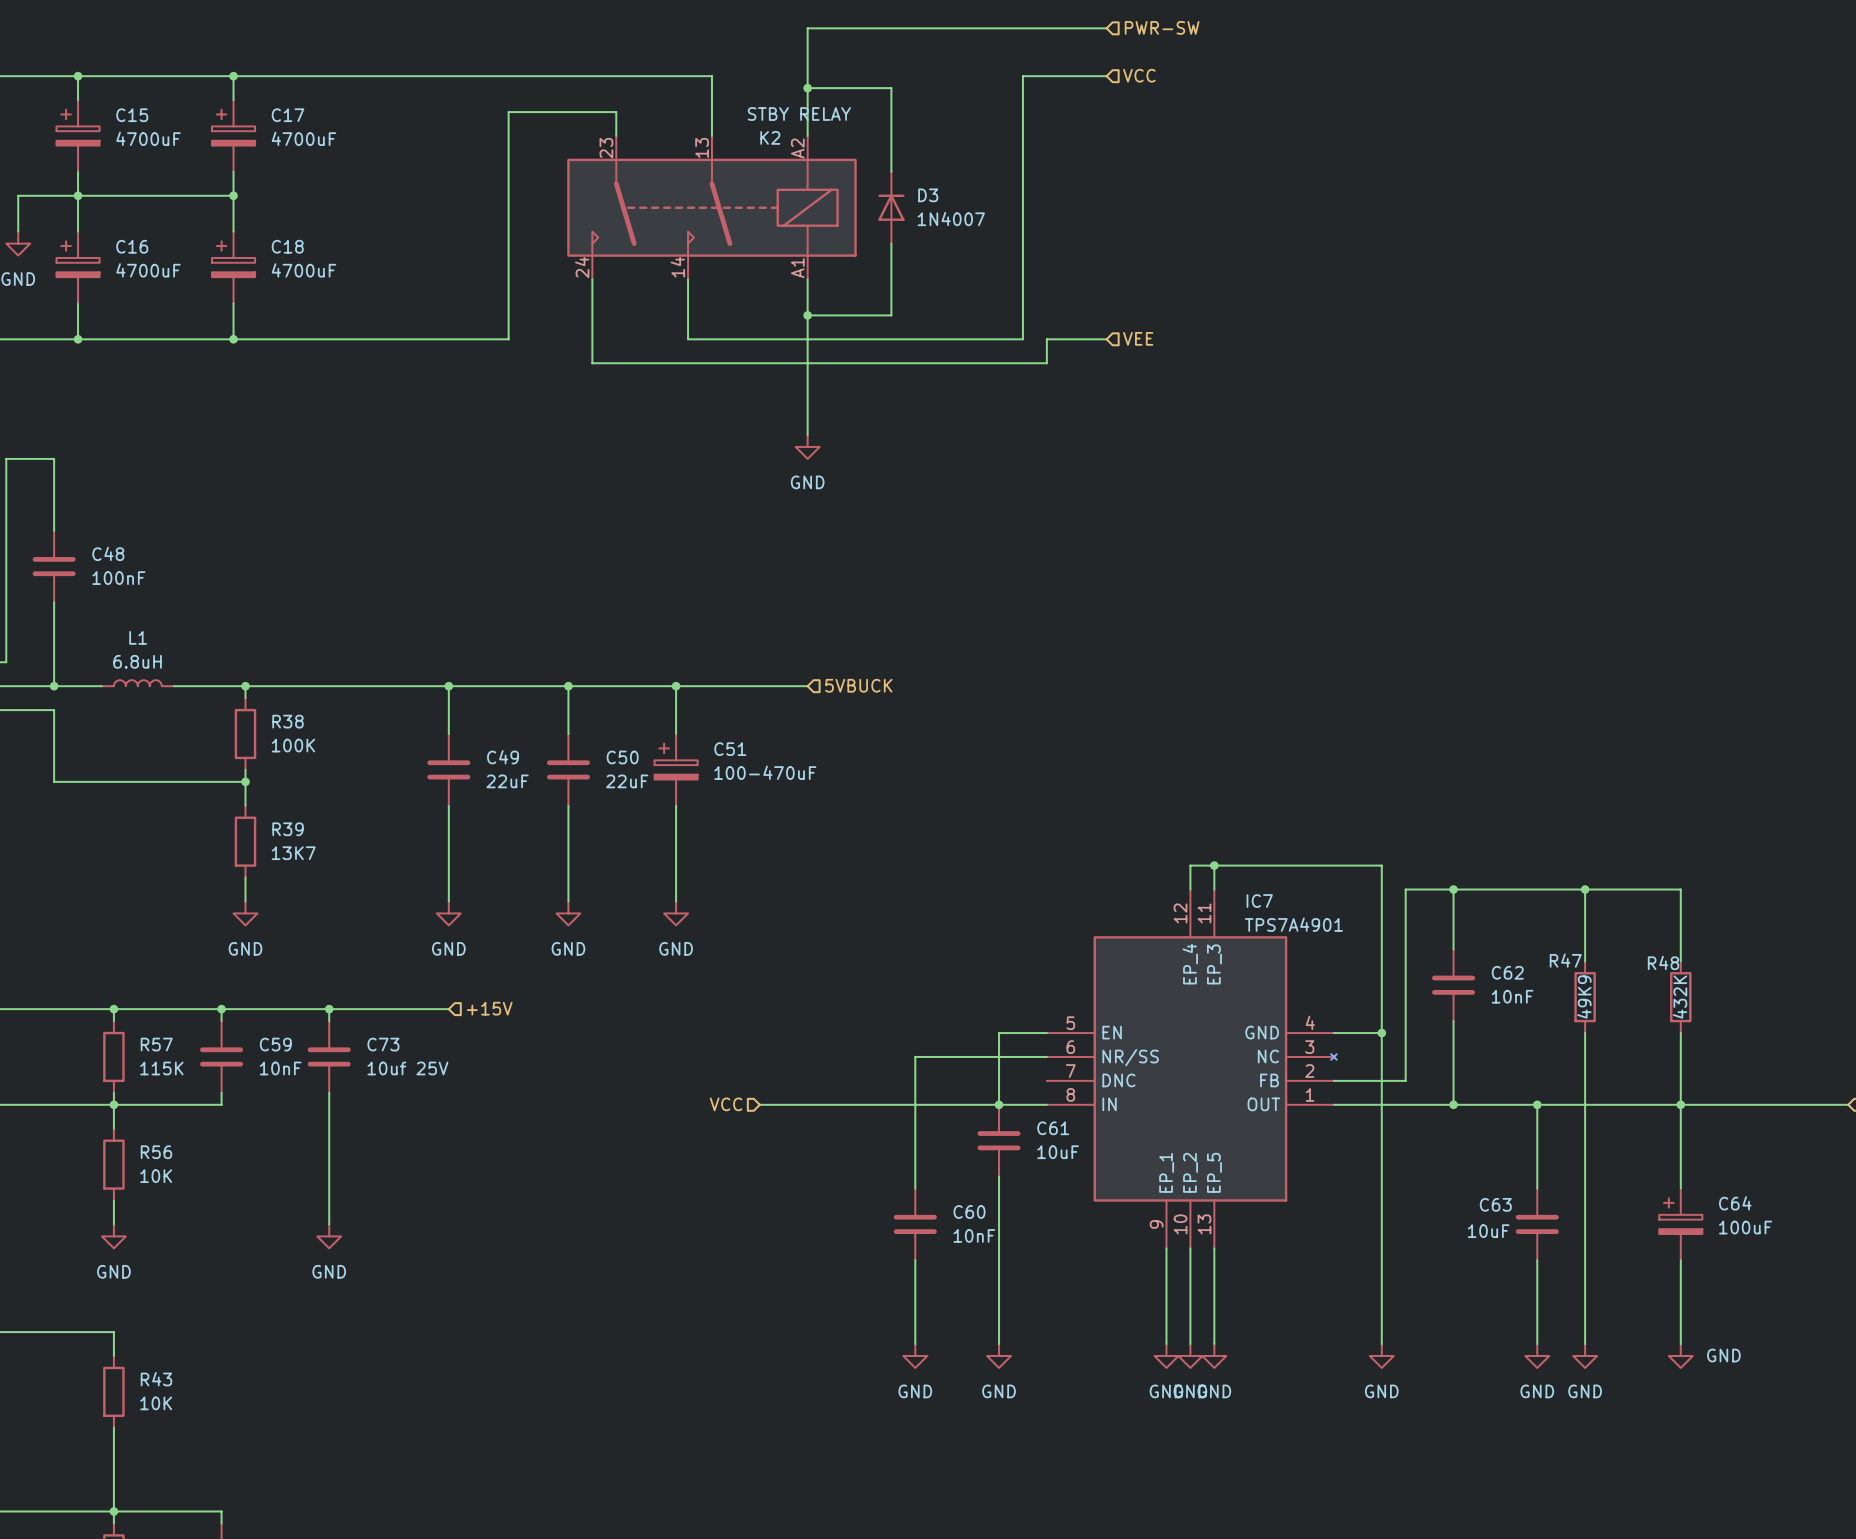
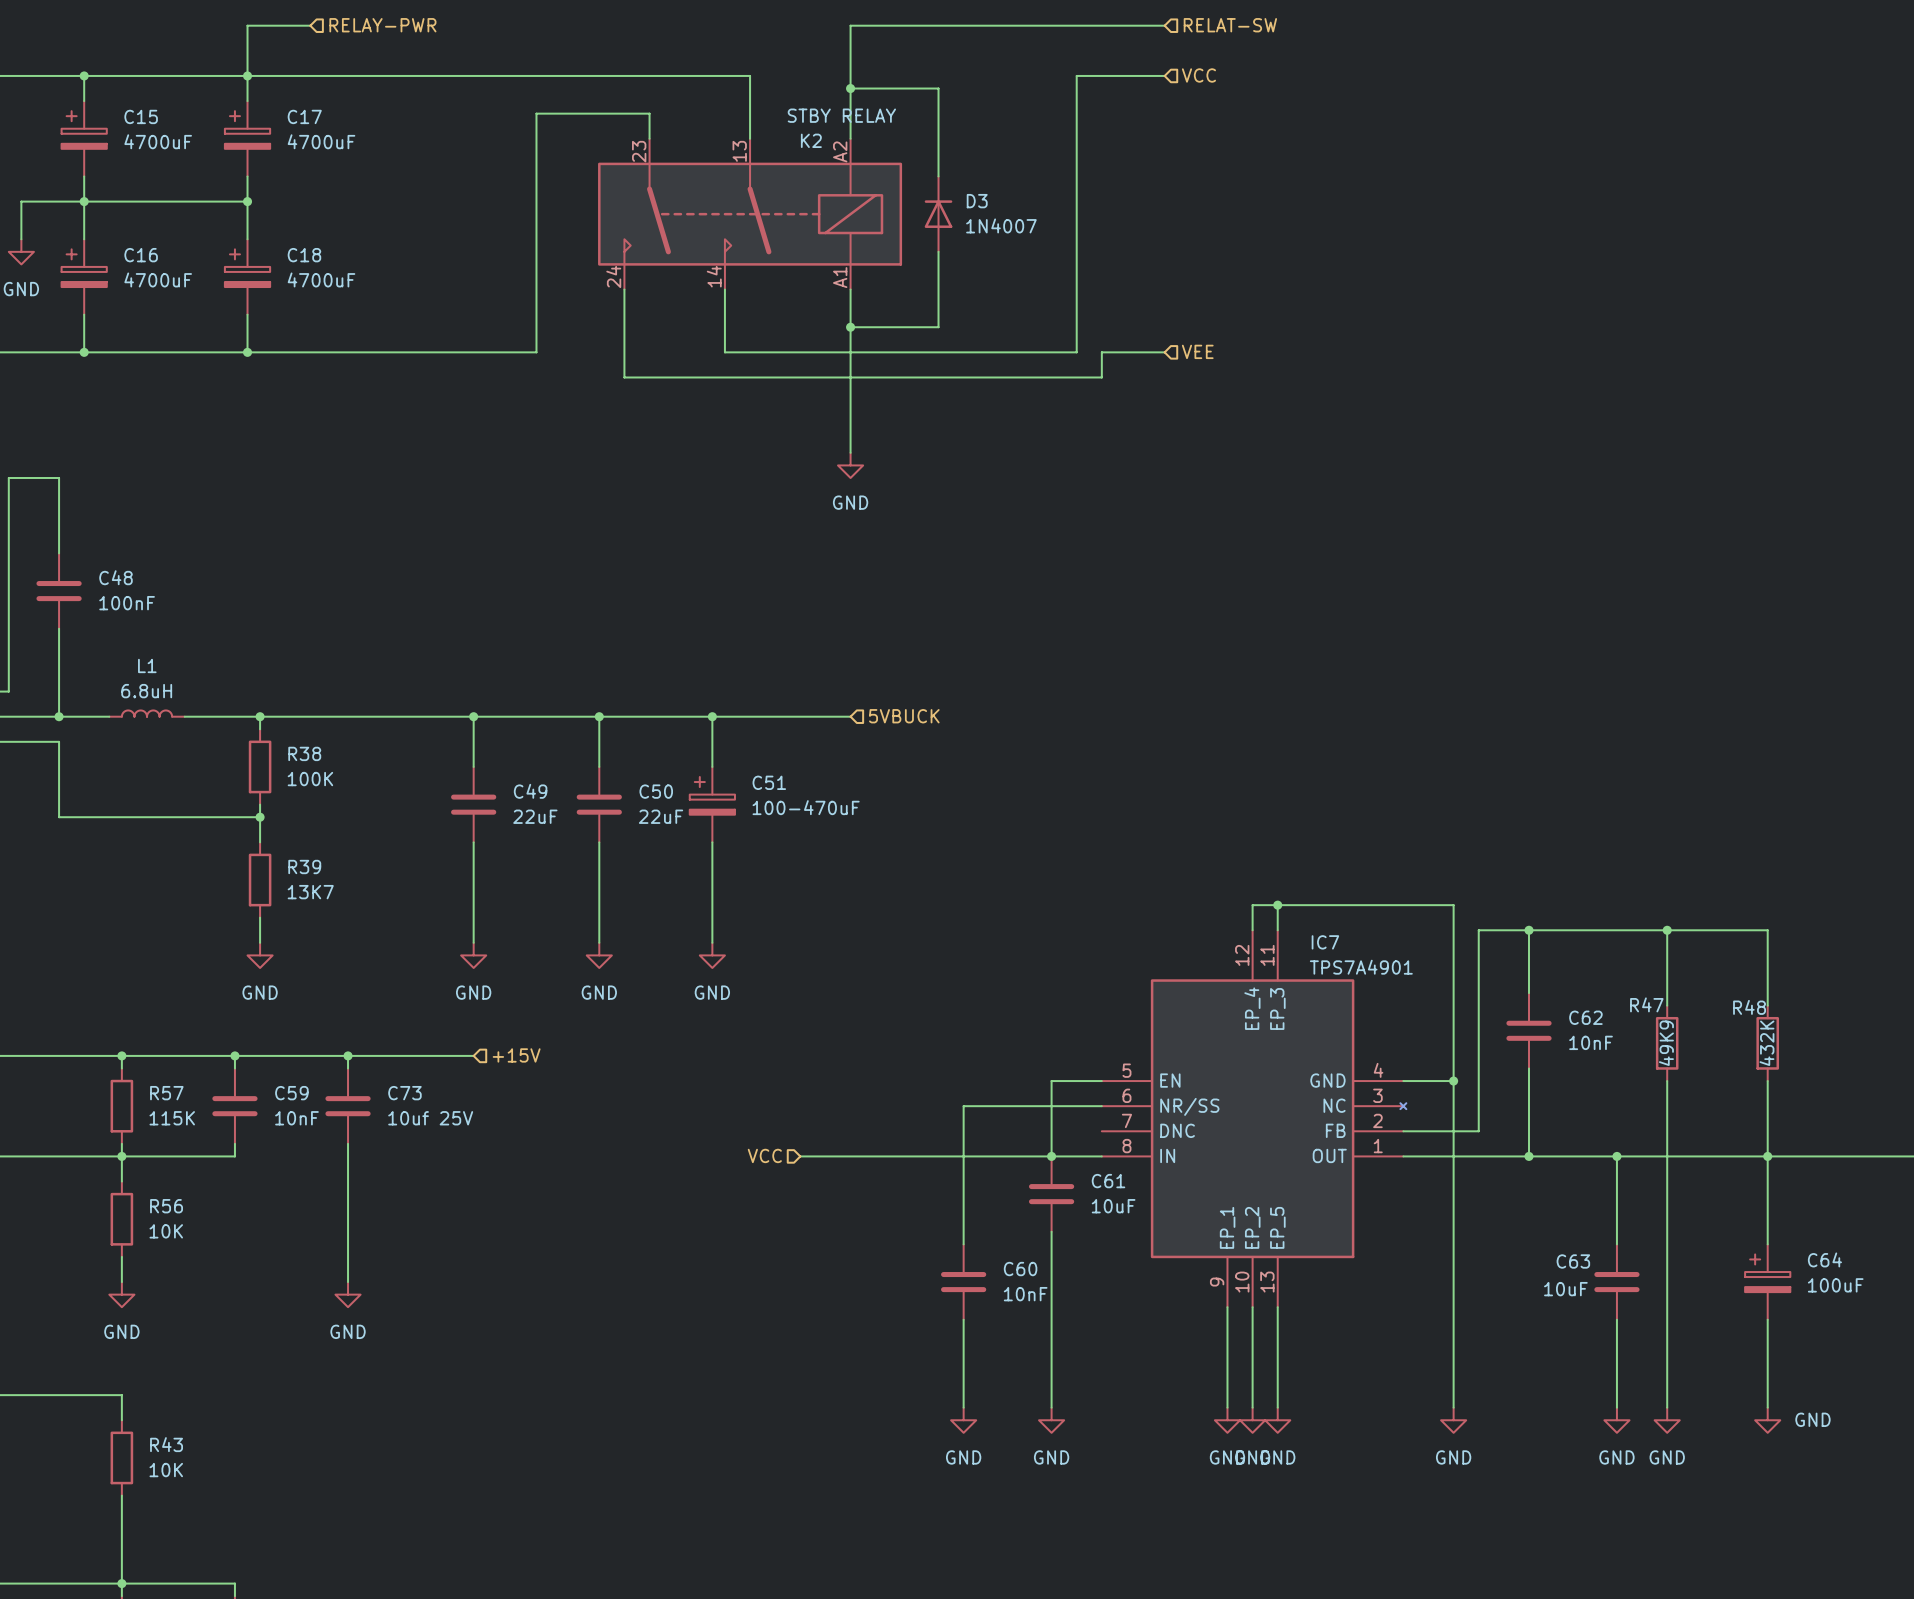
hierarchical label: none -> RELAY-PWR (382, 25)
hierarchical label: PWR-SW (1162, 27) -> RELAT-SW (1230, 25)
wire: none -> (310, 25) (247, 25) (247, 75)

